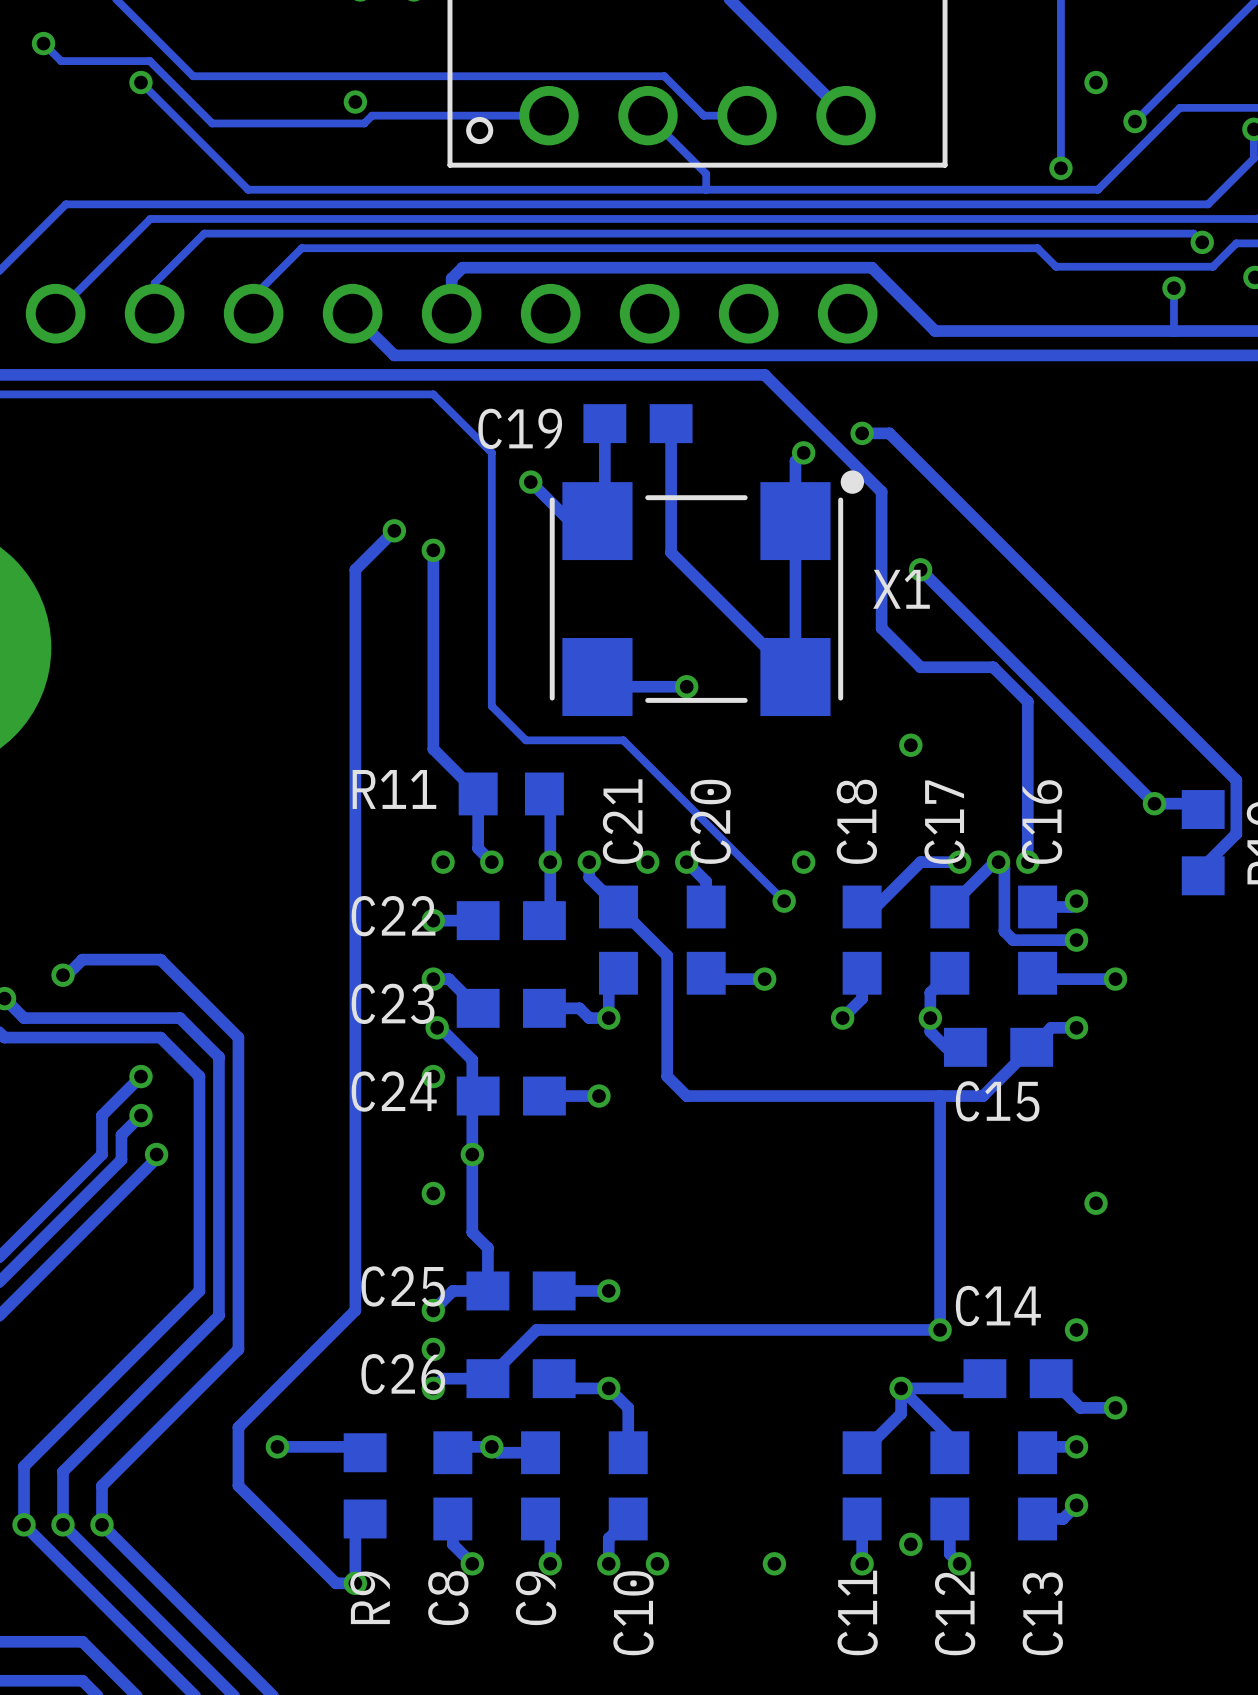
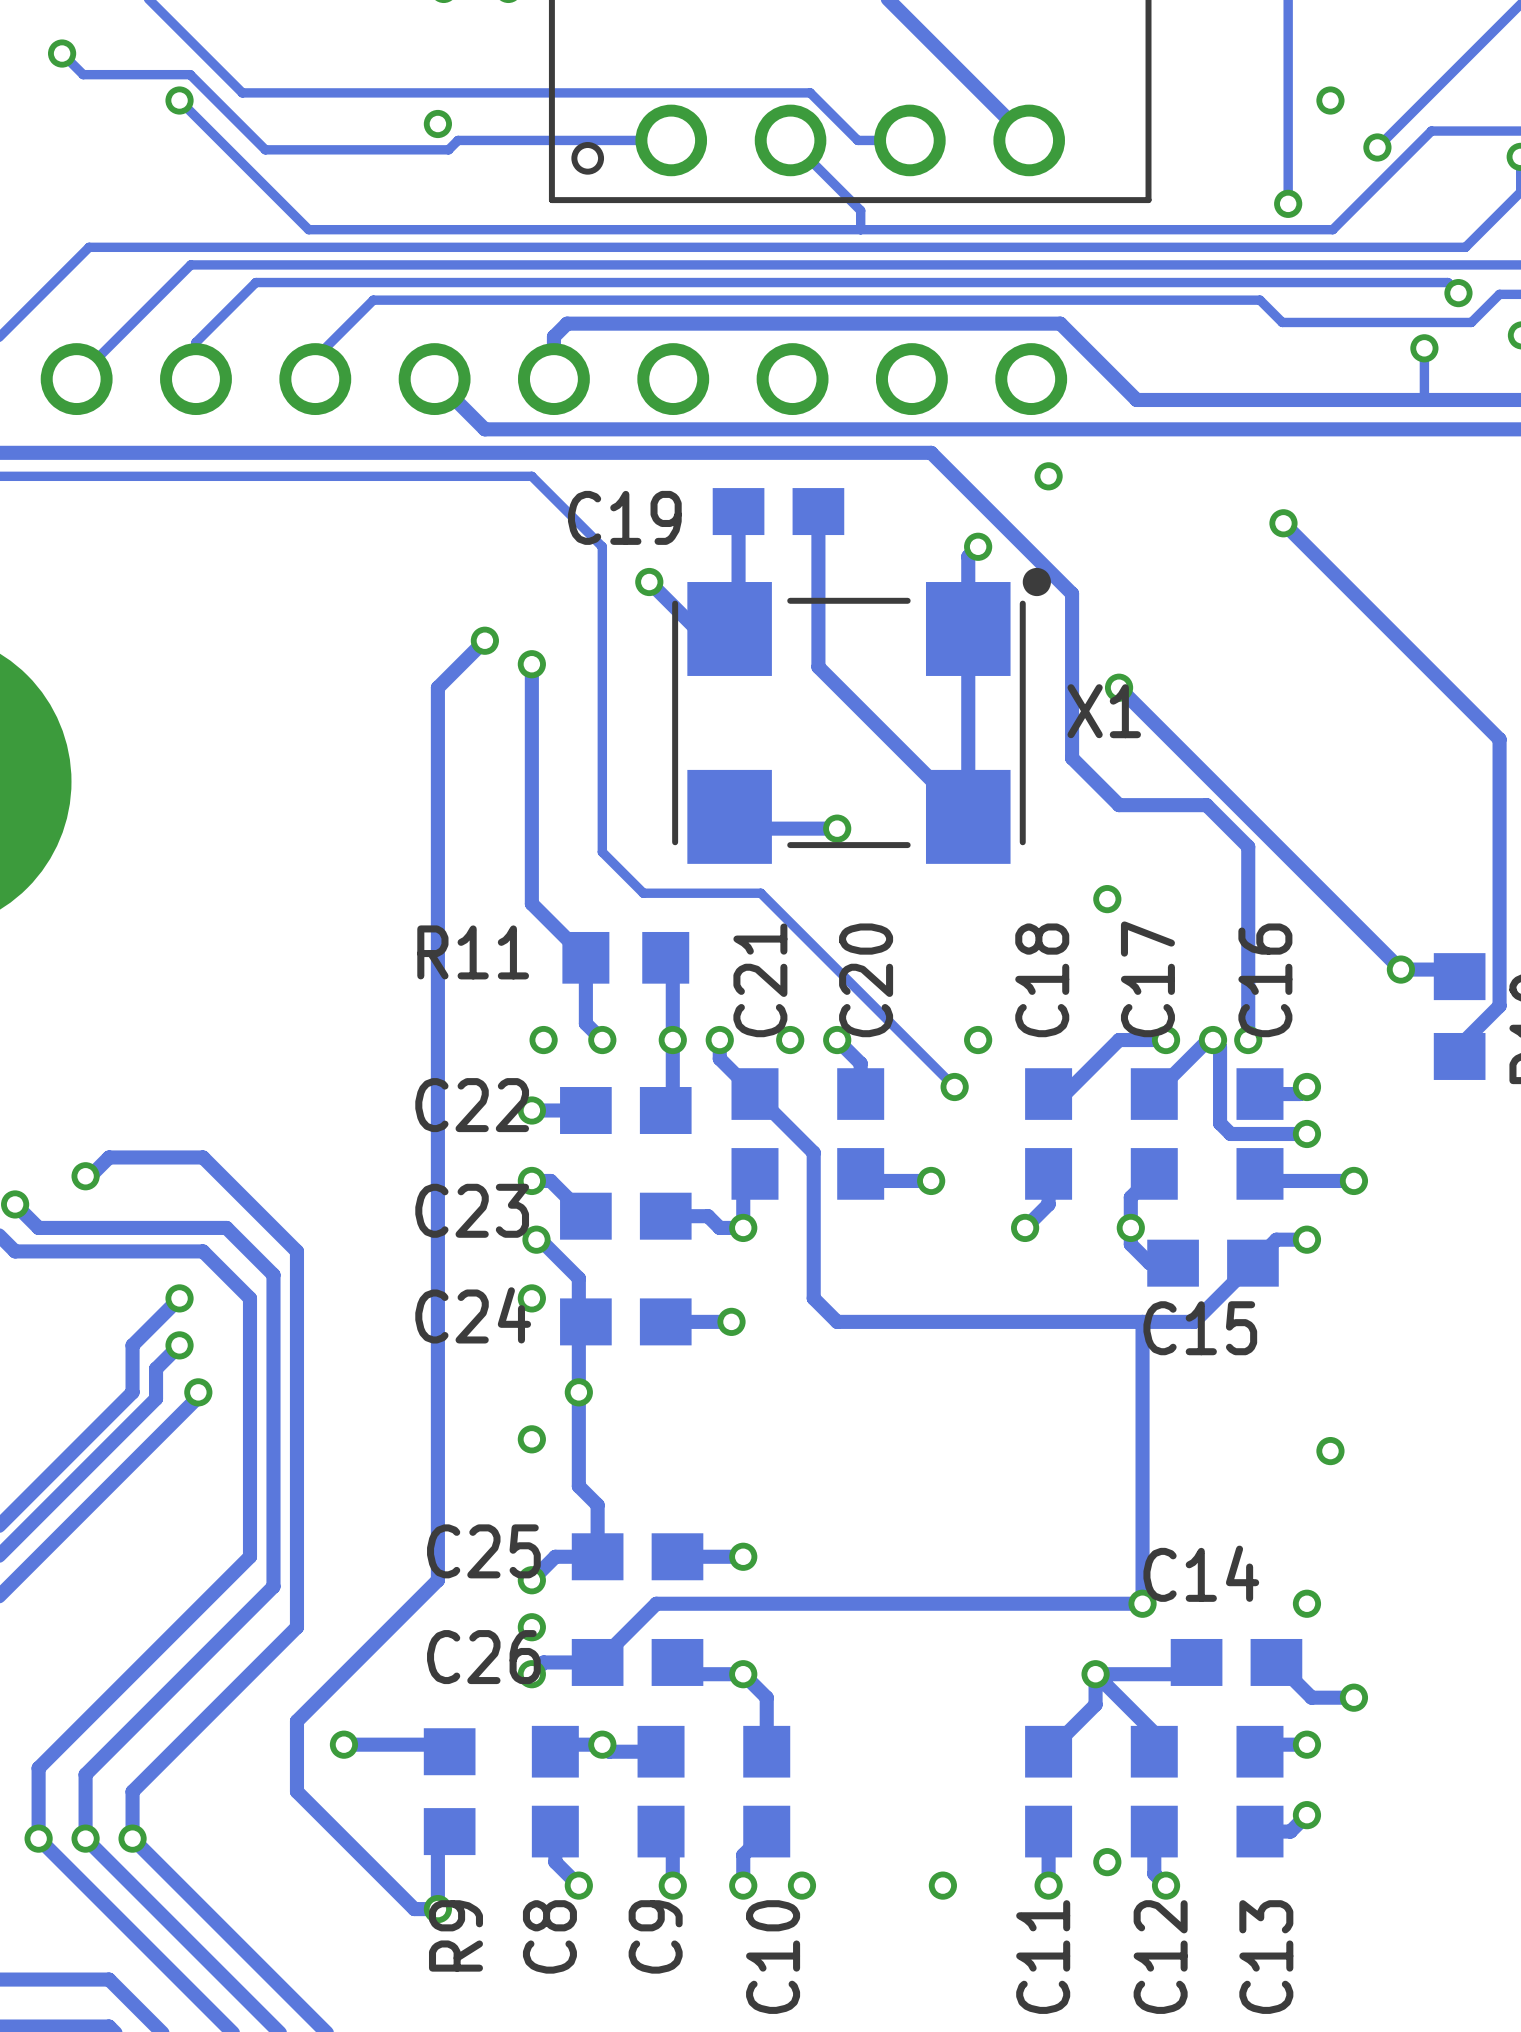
track: (862, 433) (889, 433) (1236, 780) -> (1283, 523) (1499, 739) (1499, 941)
via position: (862, 433) -> (1048, 476)
via: none -> (1283, 523)

